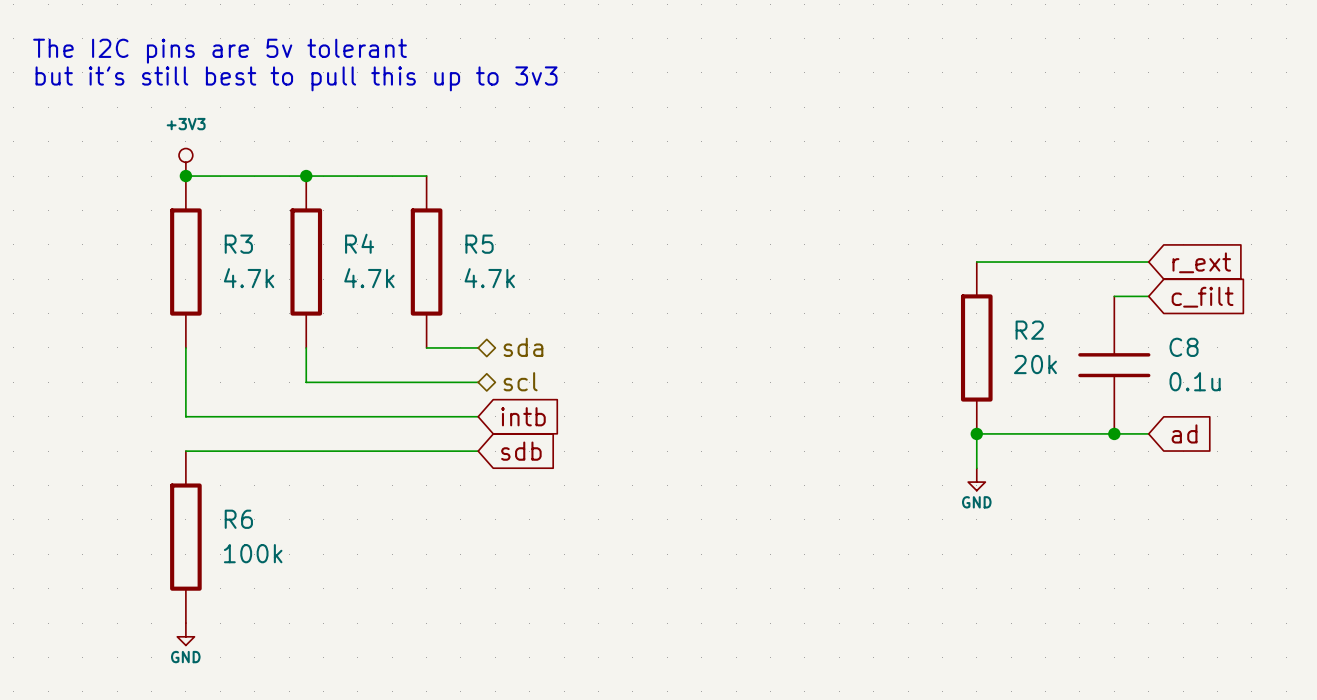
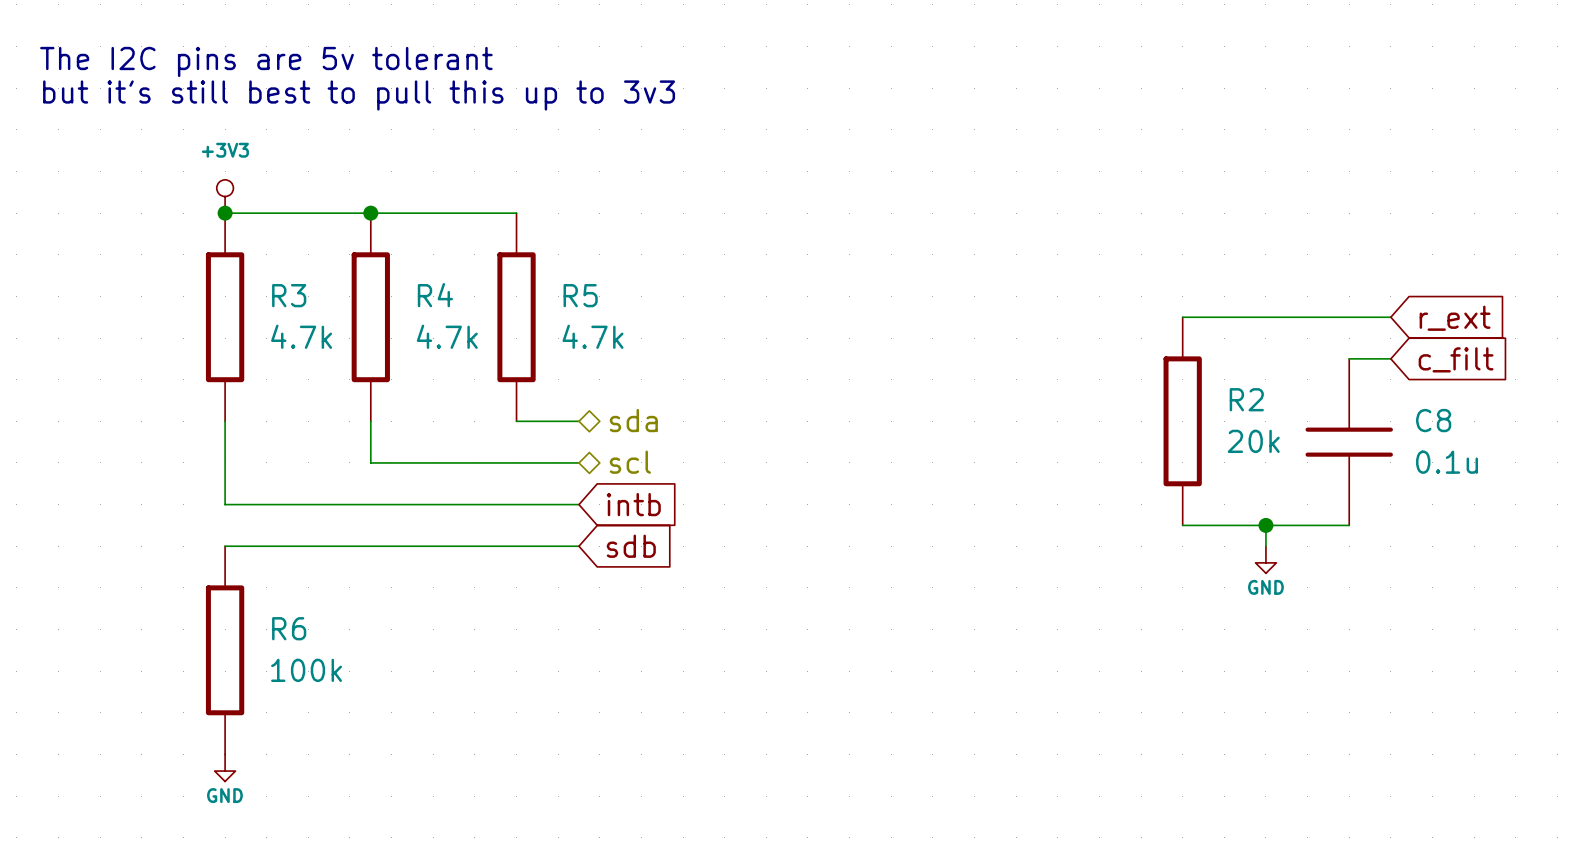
wire: (976, 433) (976, 468) -> none
junction: (976, 433) -> none
wire: none -> (1265, 525) (1265, 546)
junction: none -> (1265, 525)
wire: (1114, 433) (1148, 433) -> none
junction: (1114, 433) -> none
global label: ad (1184, 433) -> none
power symbol position: GND (976, 479) -> GND (1265, 559)

